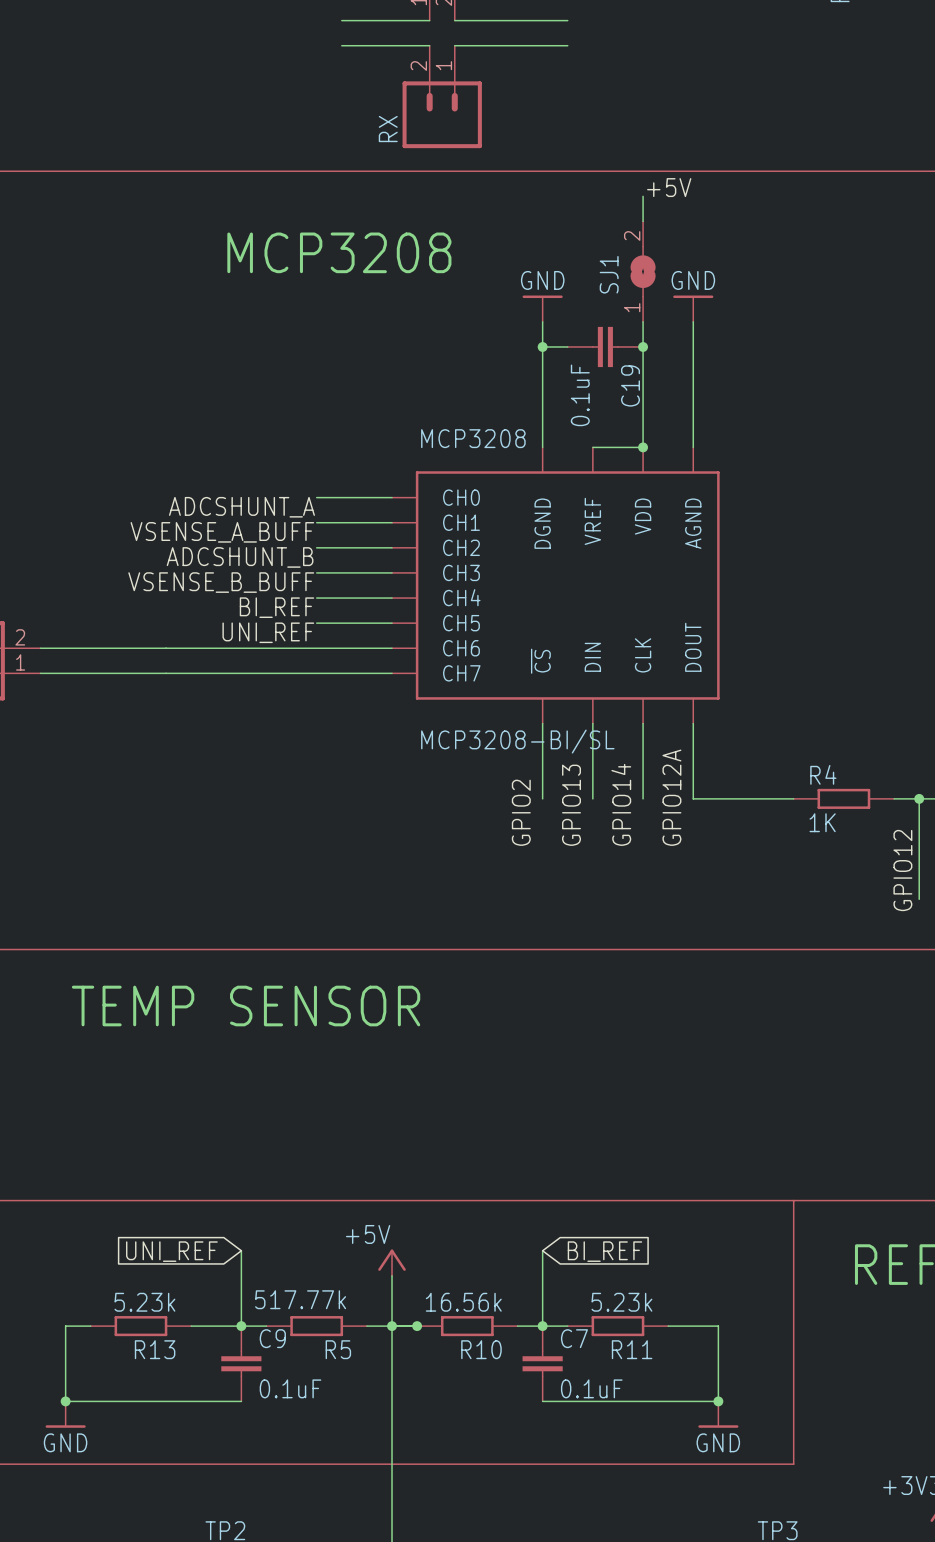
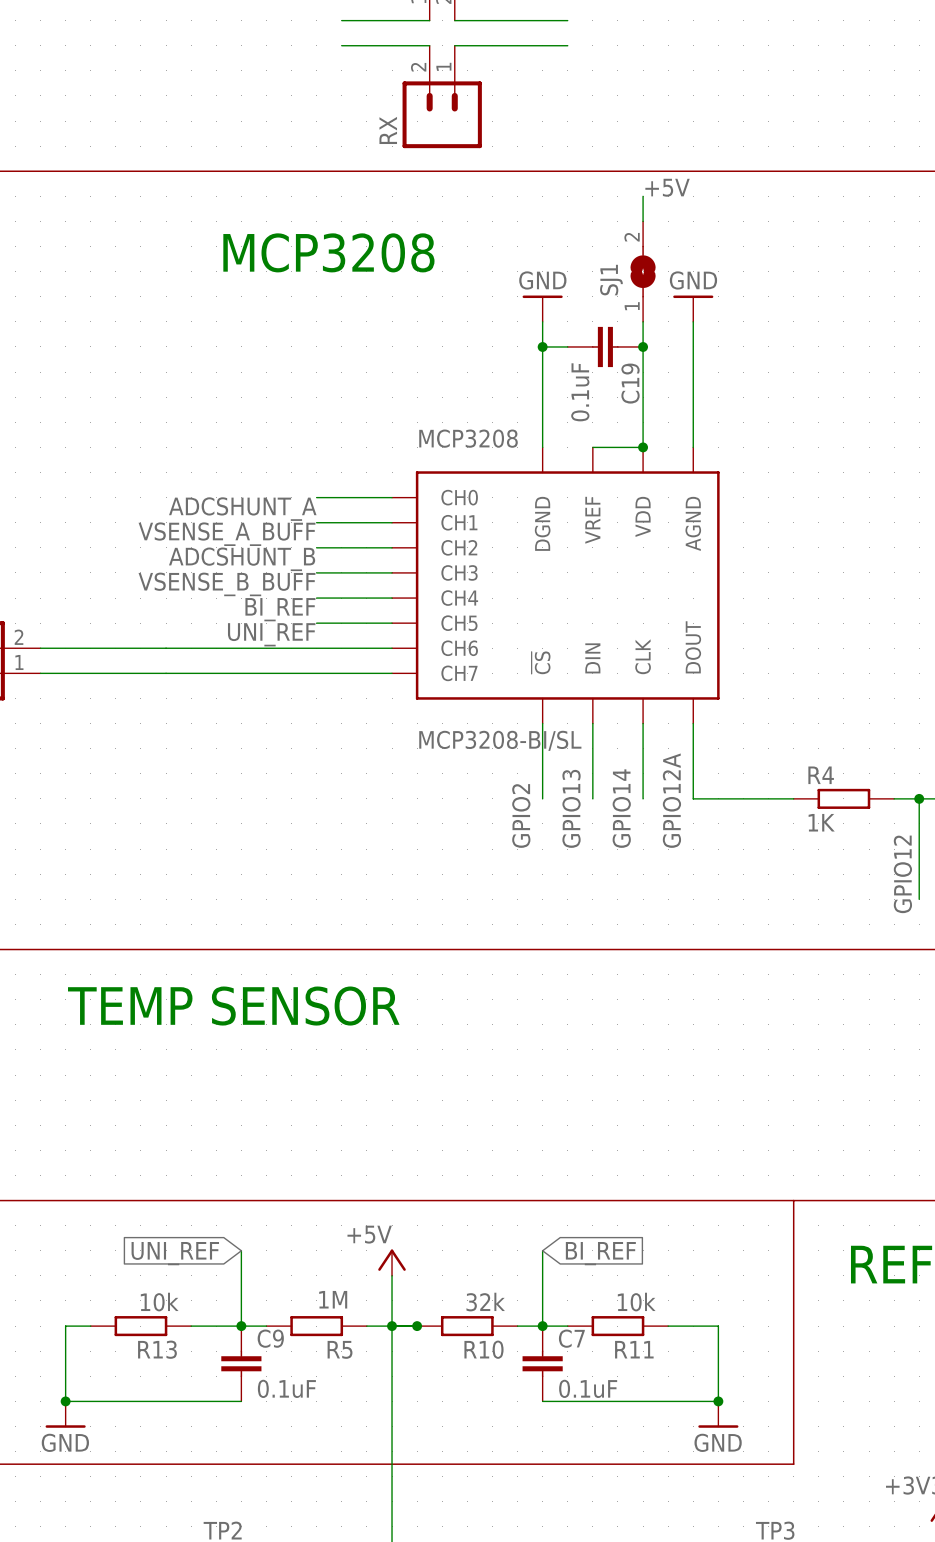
R5 value: 517.77k (300, 1299) -> 1M (333, 1299)
R13 value: 5.23k (144, 1302) -> 10k (159, 1302)
R10 value: 16.56k (463, 1302) -> 32k (485, 1302)
R11 value: 5.23k (621, 1302) -> 10k (636, 1302)

